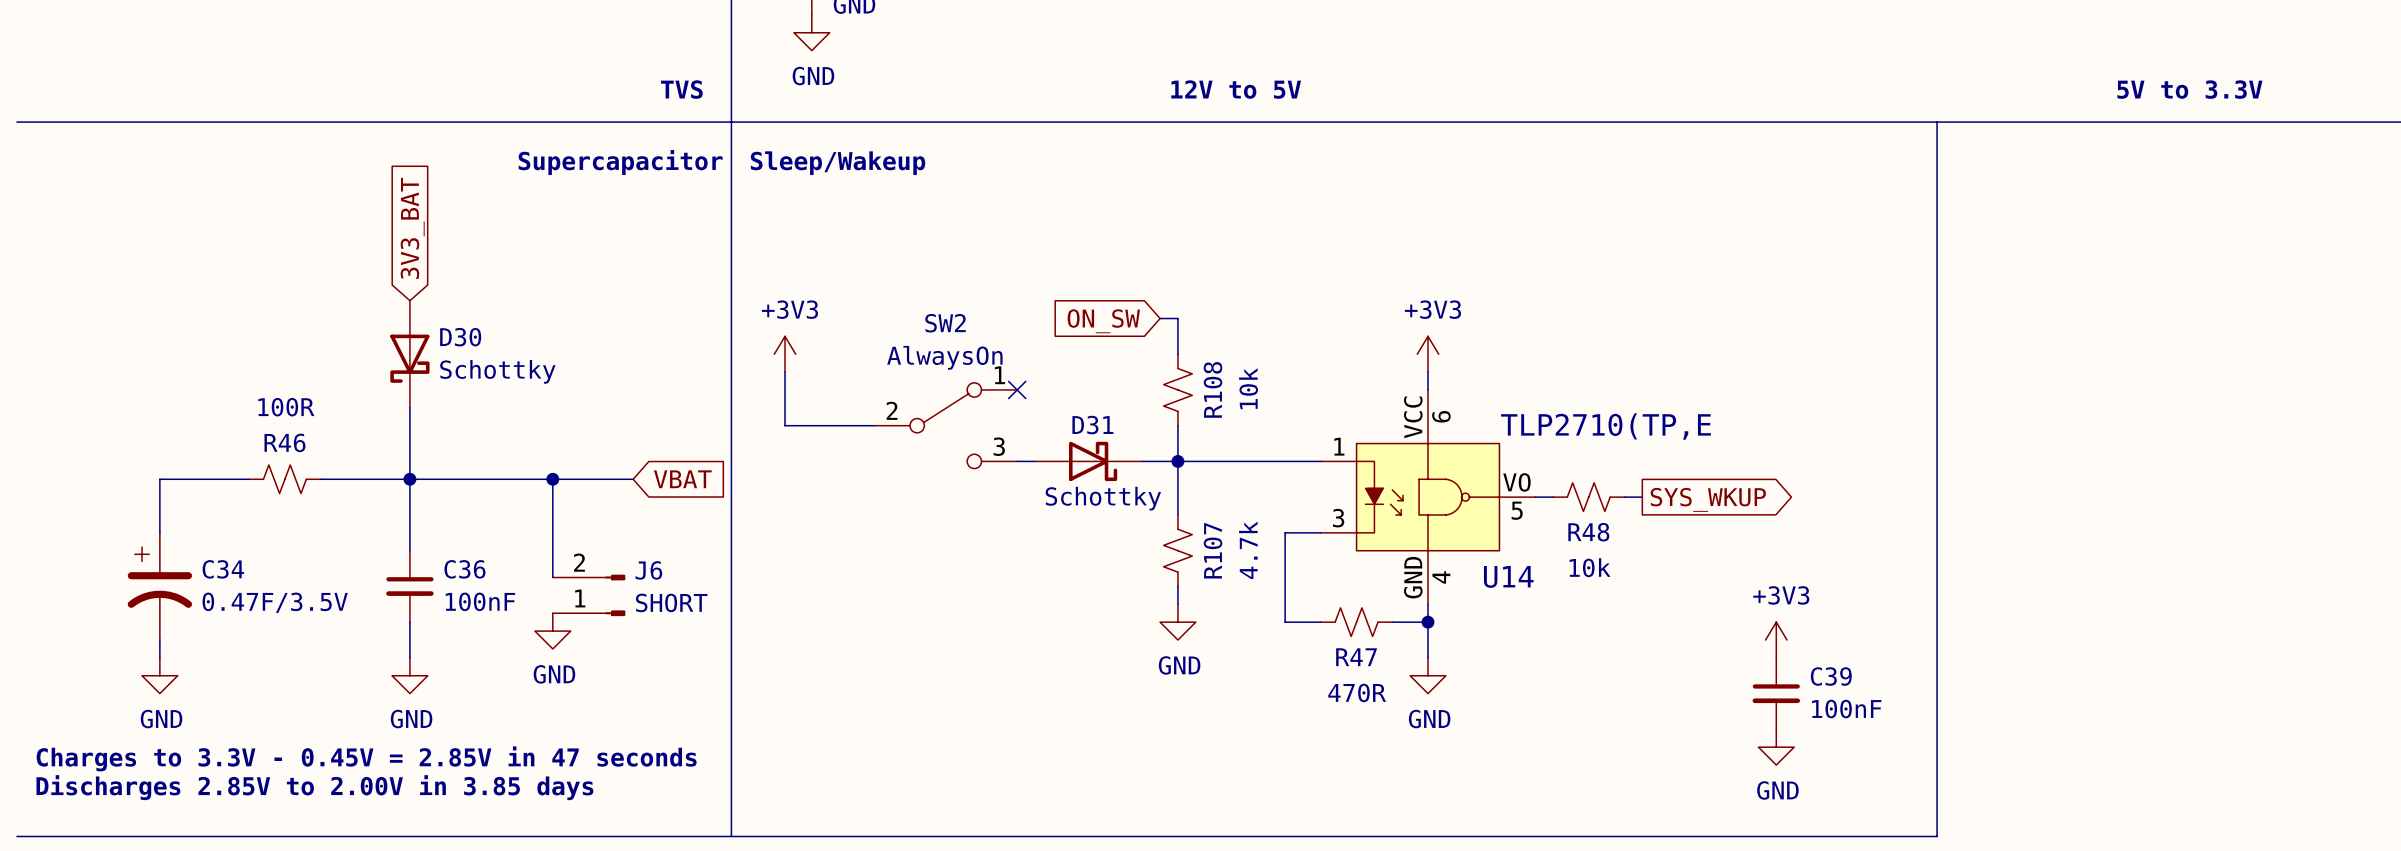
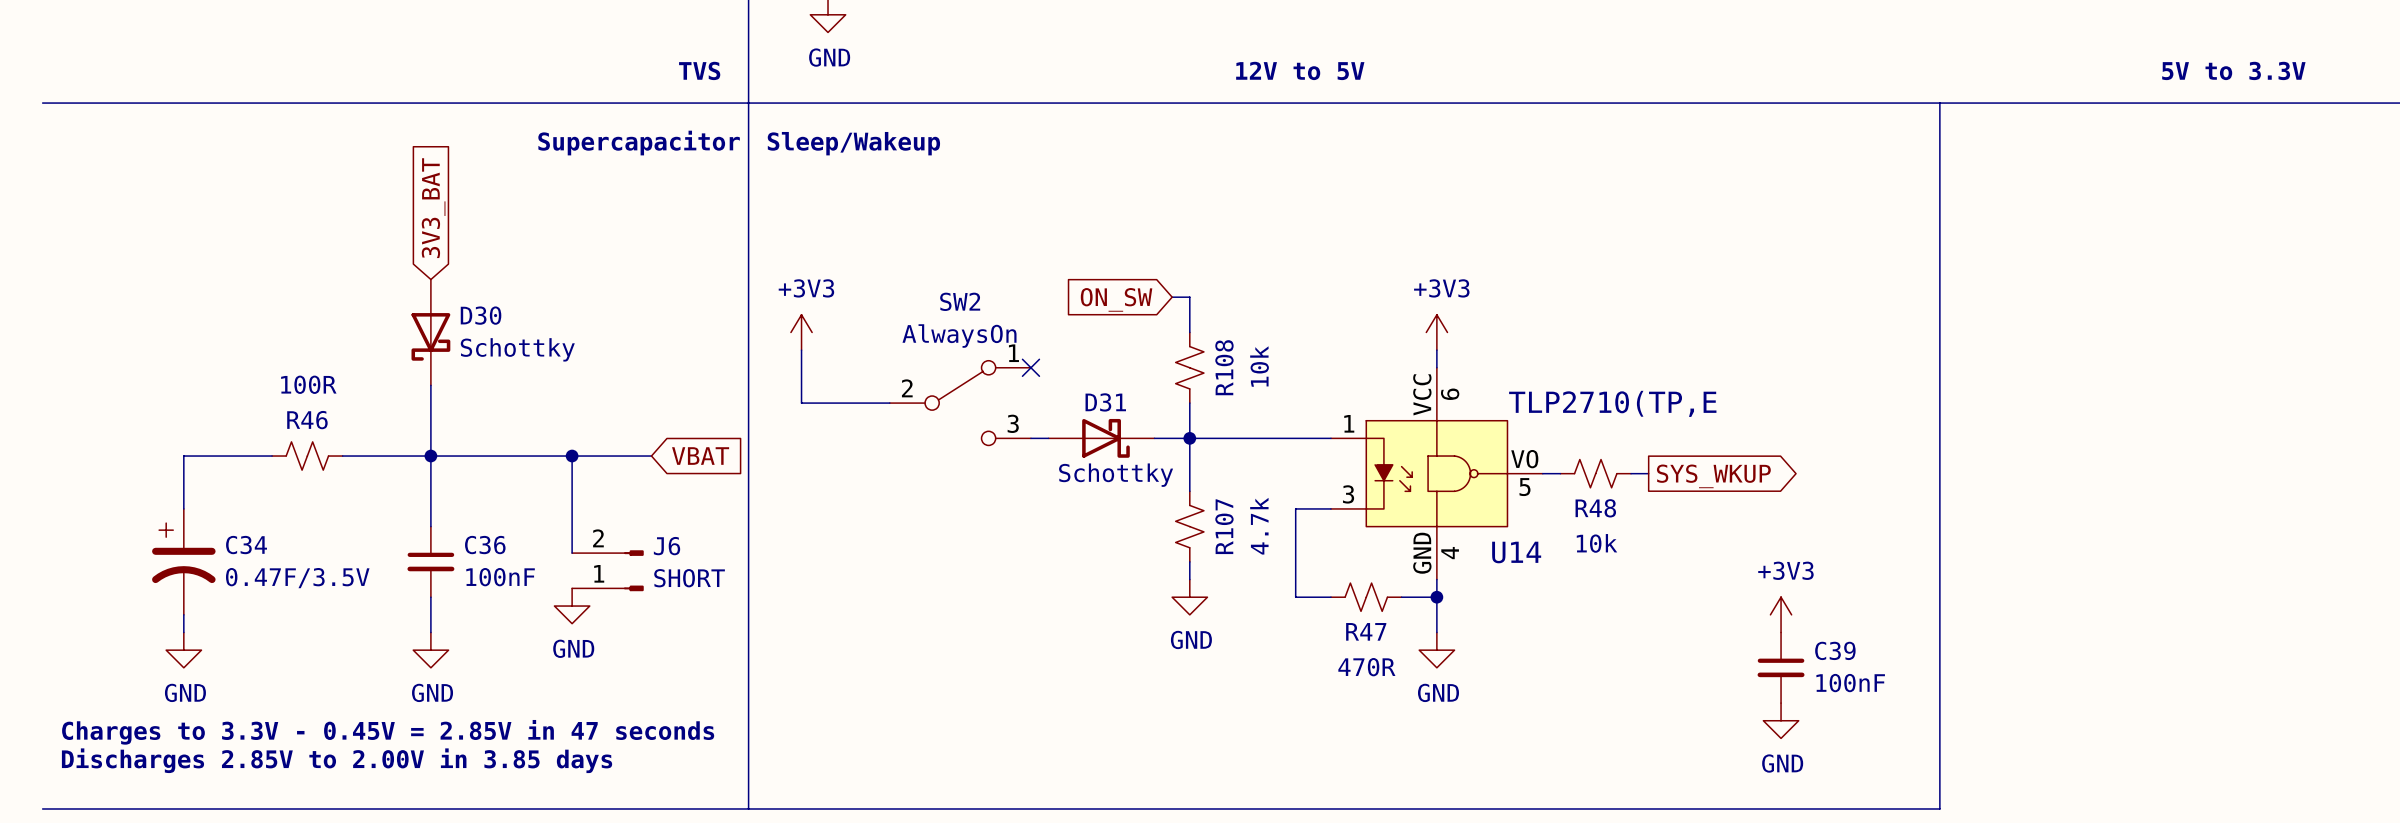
text position: 12V to 5V (1236, 89) -> 12V to 5V (1300, 70)
text position: 5V to 3.3V (2189, 89) -> 5V to 3.3V (2233, 70)

